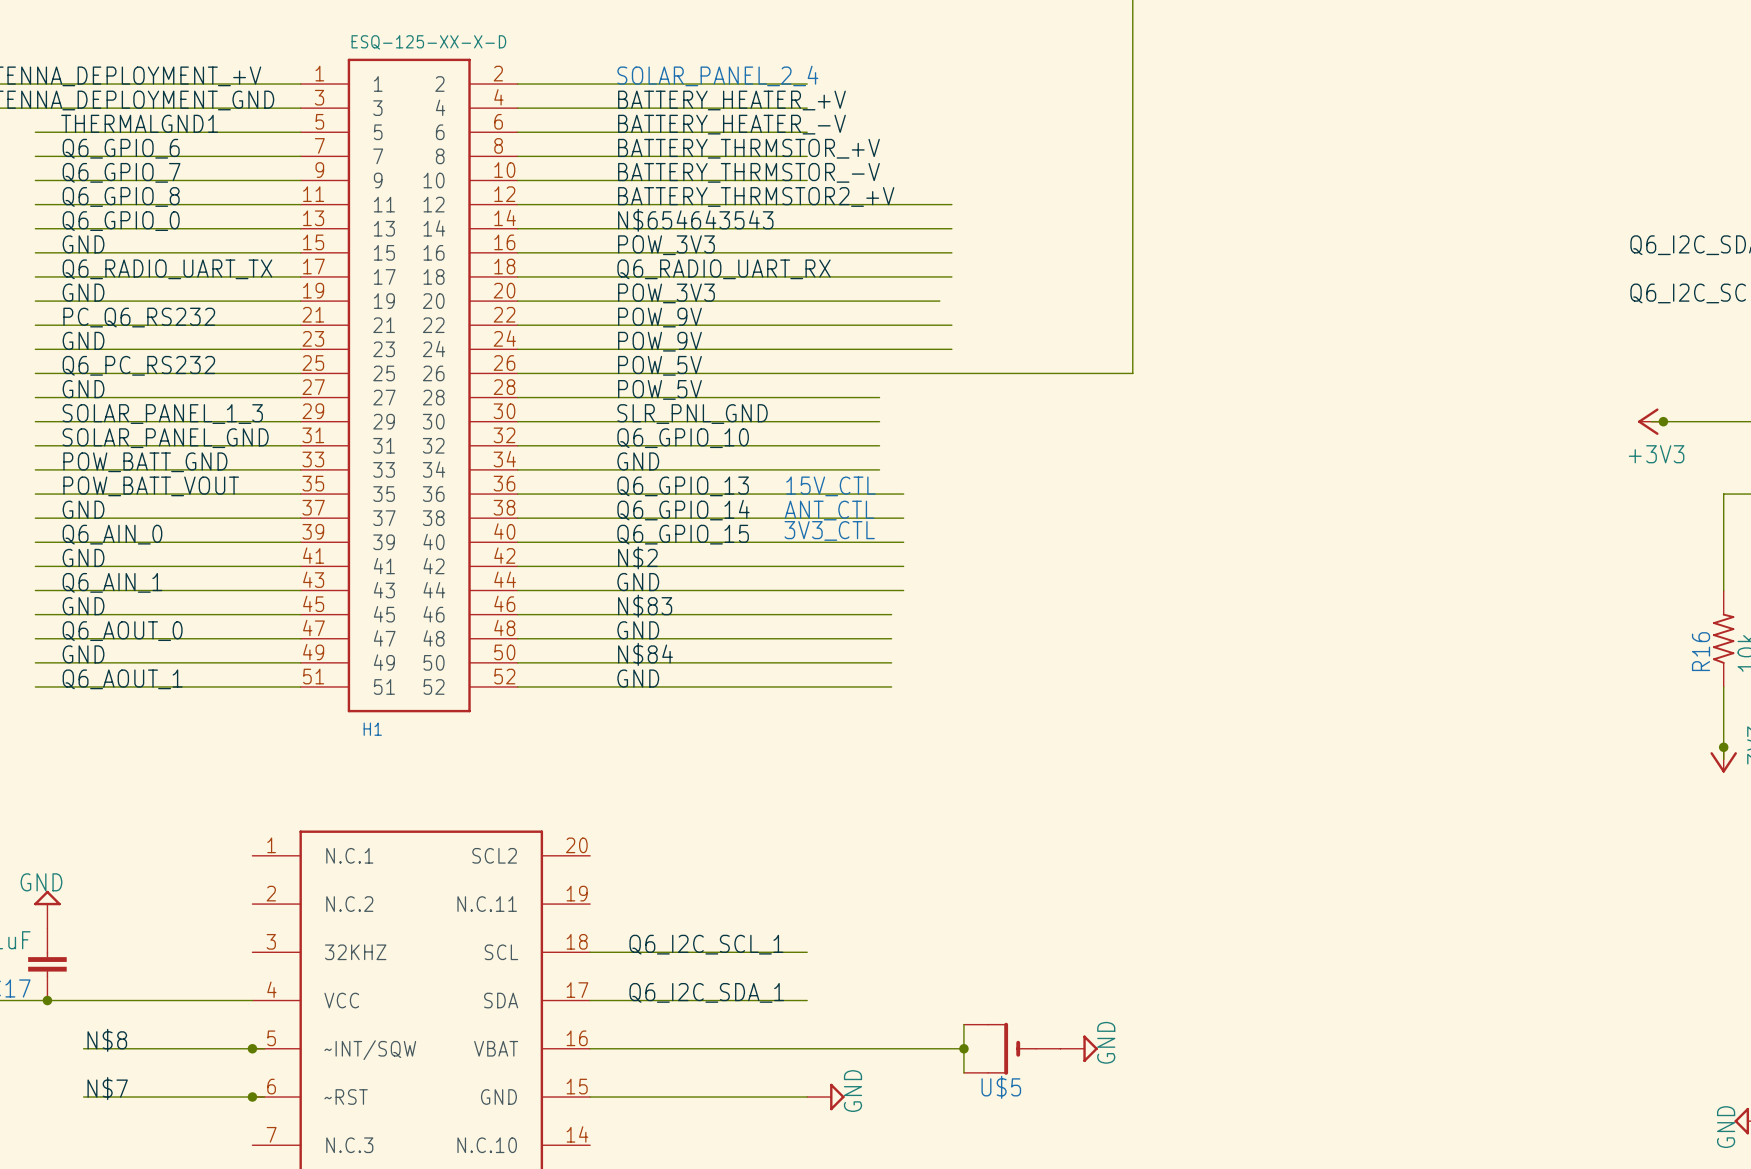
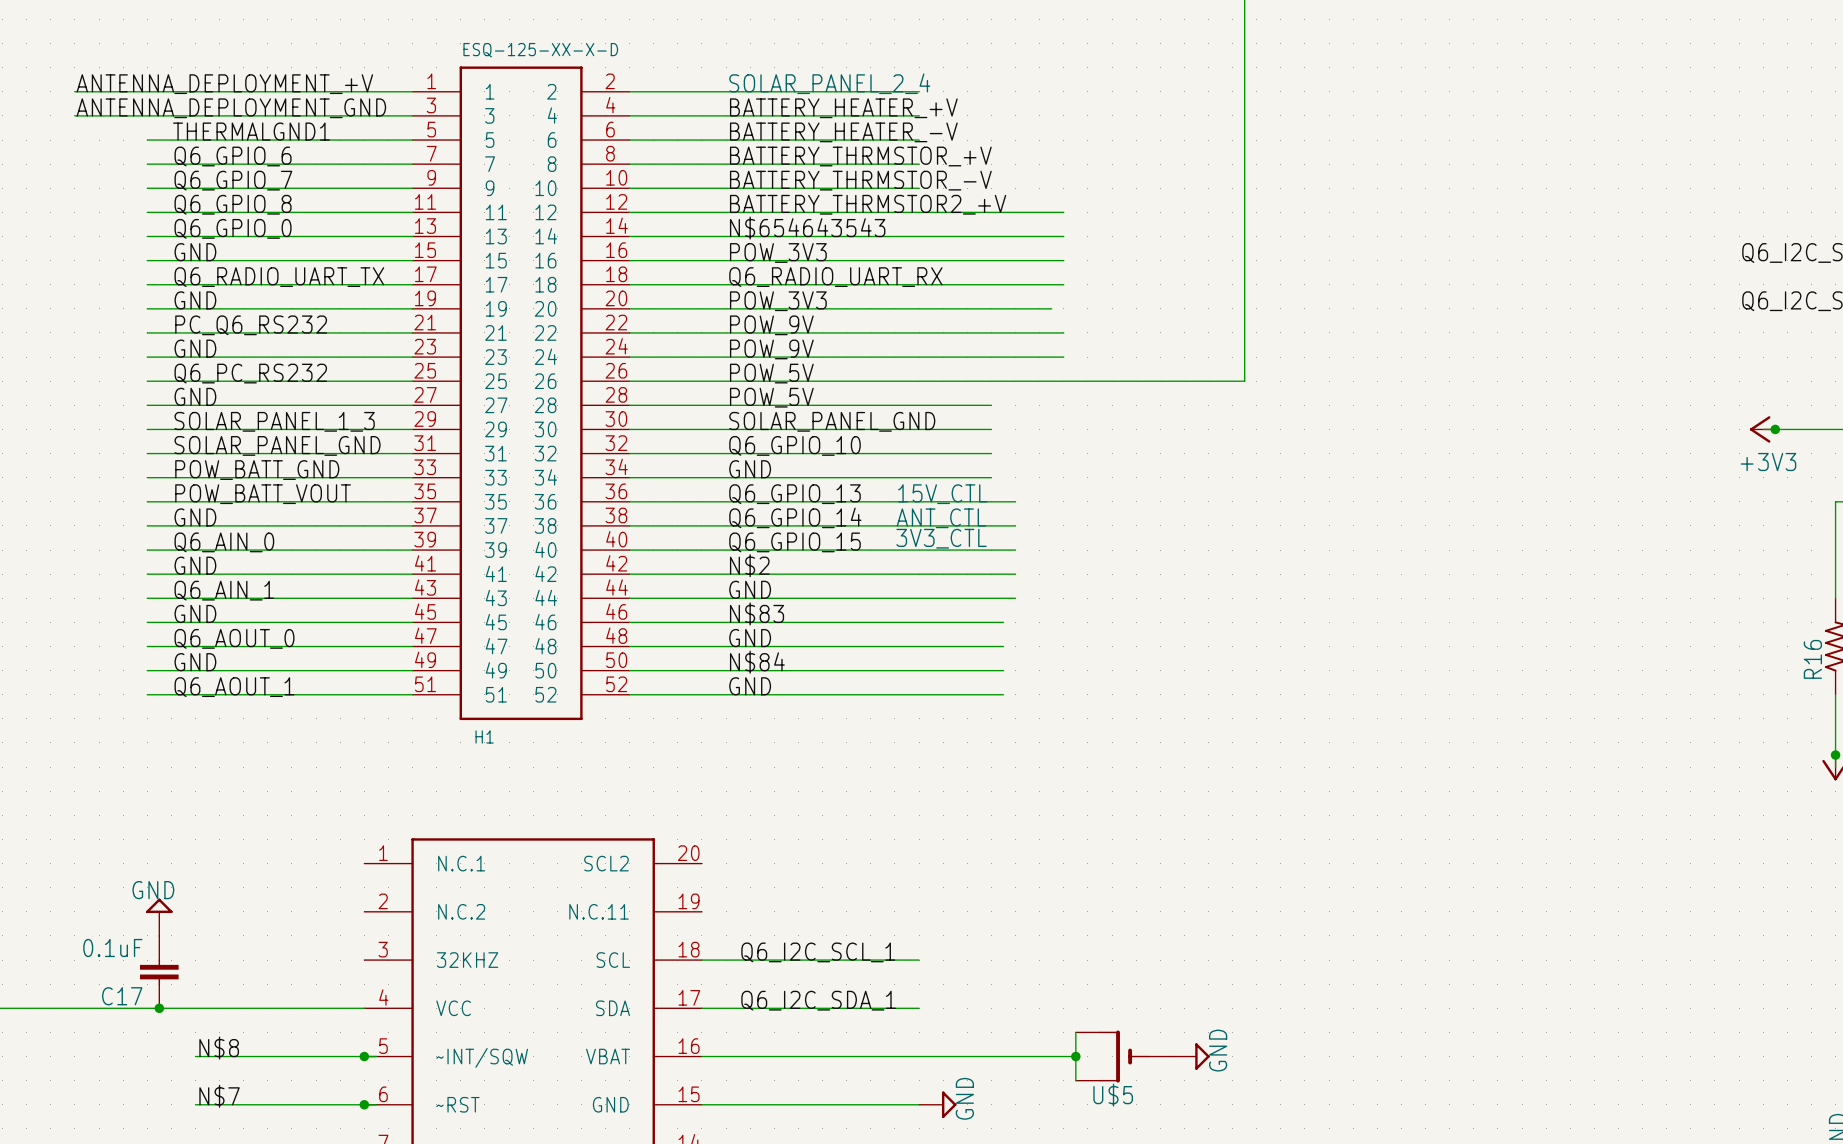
label: SLR_PNL_GND (692, 414) -> SOLAR_PANEL_GND (832, 421)

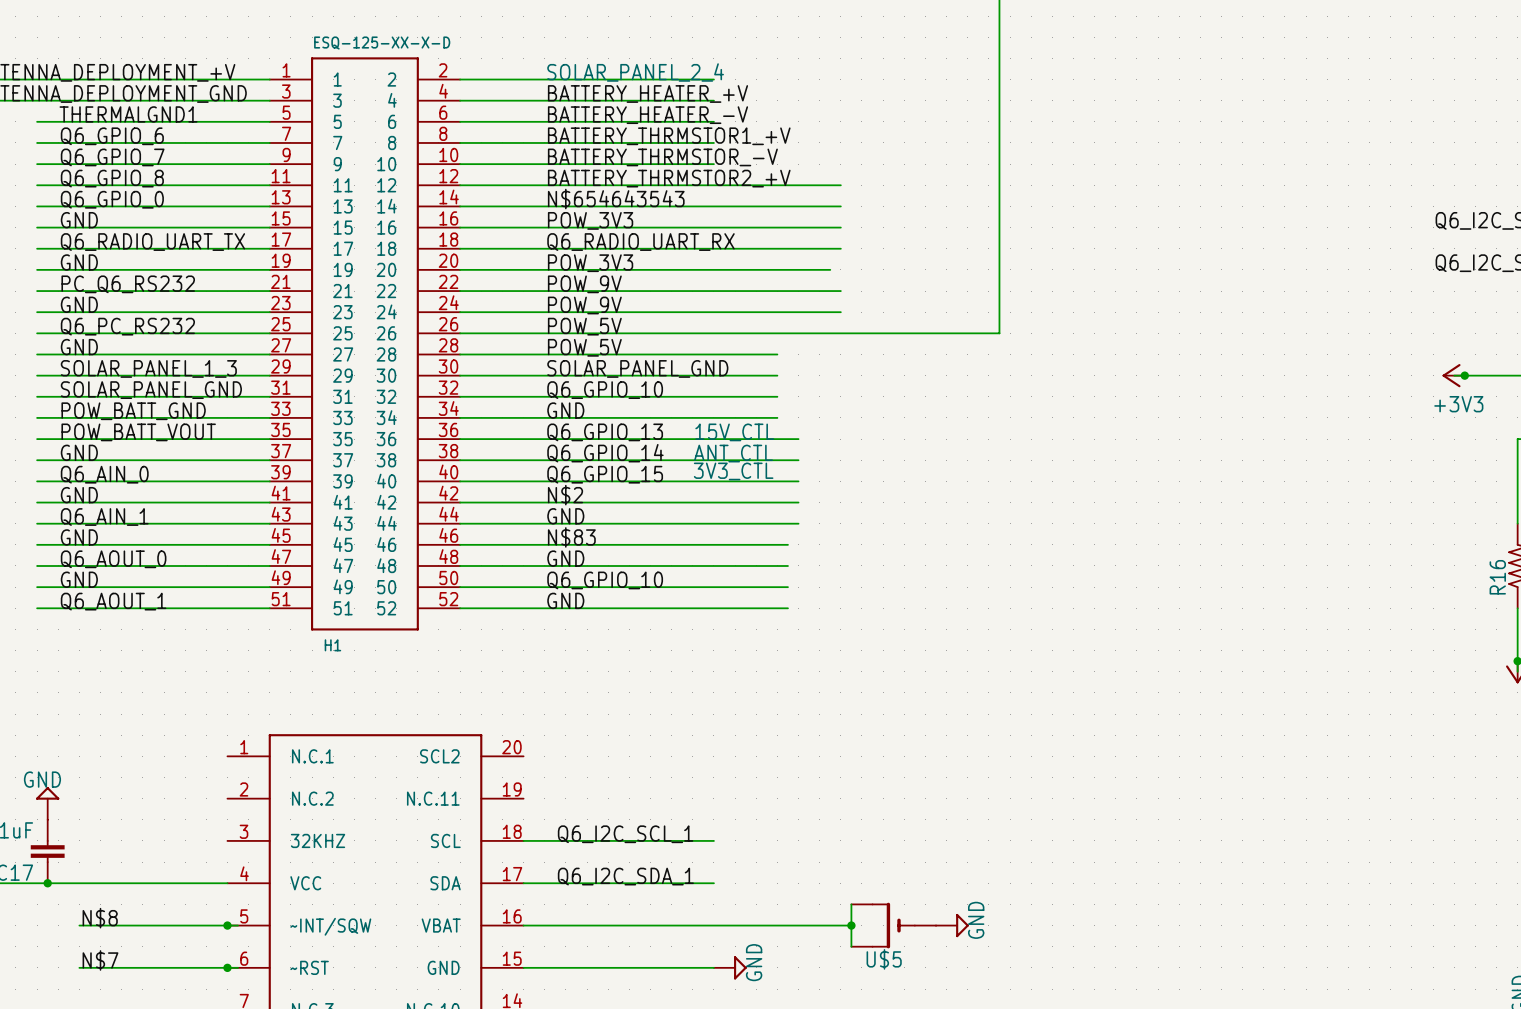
label: BATTERY_THRMSTOR_+V (860, 156) -> BATTERY_THRMSTOR1_+V (669, 136)
label: N$84 (757, 662) -> Q6_GPIO_10 (605, 580)

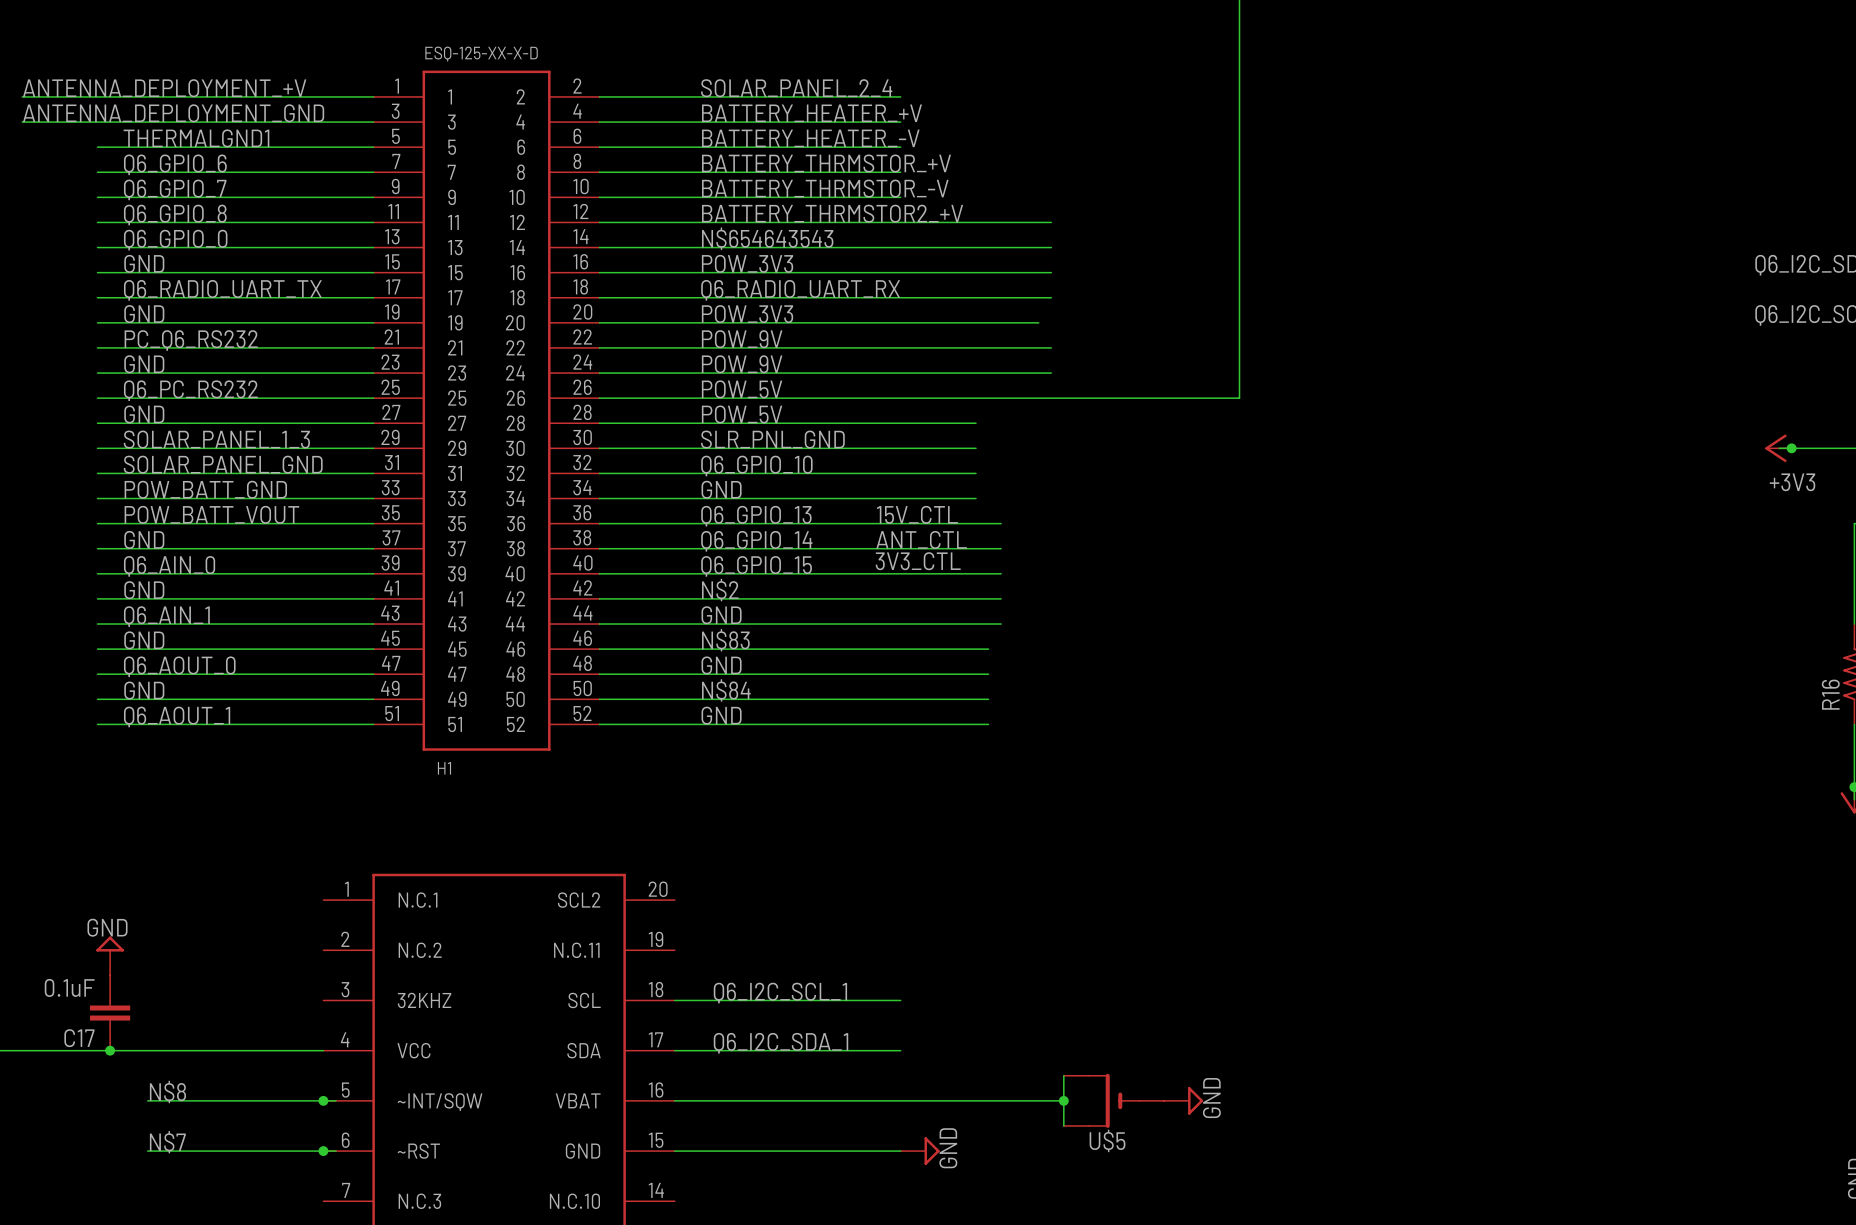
label: BATTERY_THRMSTOR1_+V (669, 136) -> BATTERY_THRMSTOR_+V (826, 163)
label: SOLAR_PANEL_GND (637, 368) -> SLR_PNL_GND (772, 439)
label: Q6_GPIO_10 (605, 580) -> N$84 (726, 690)

